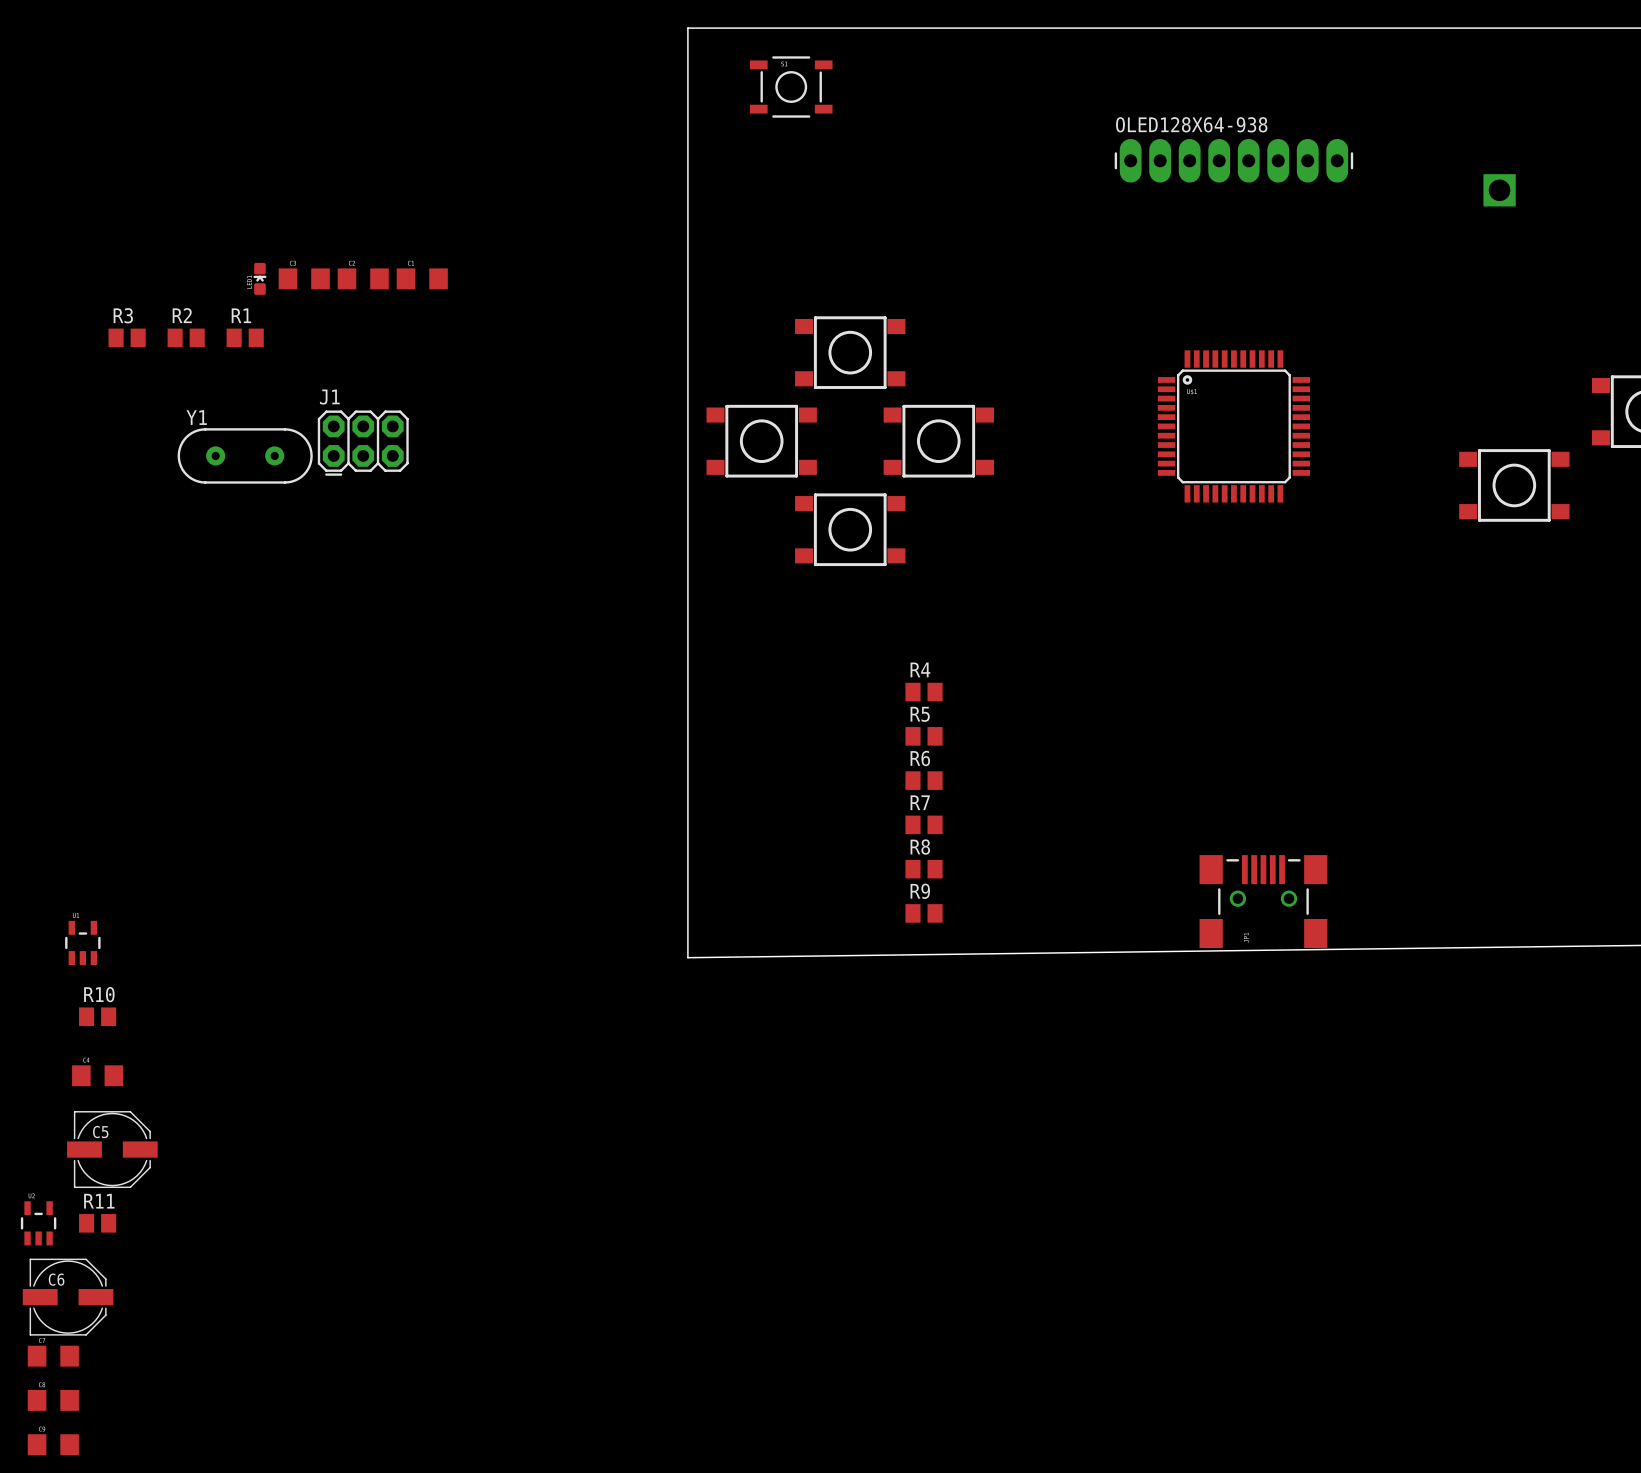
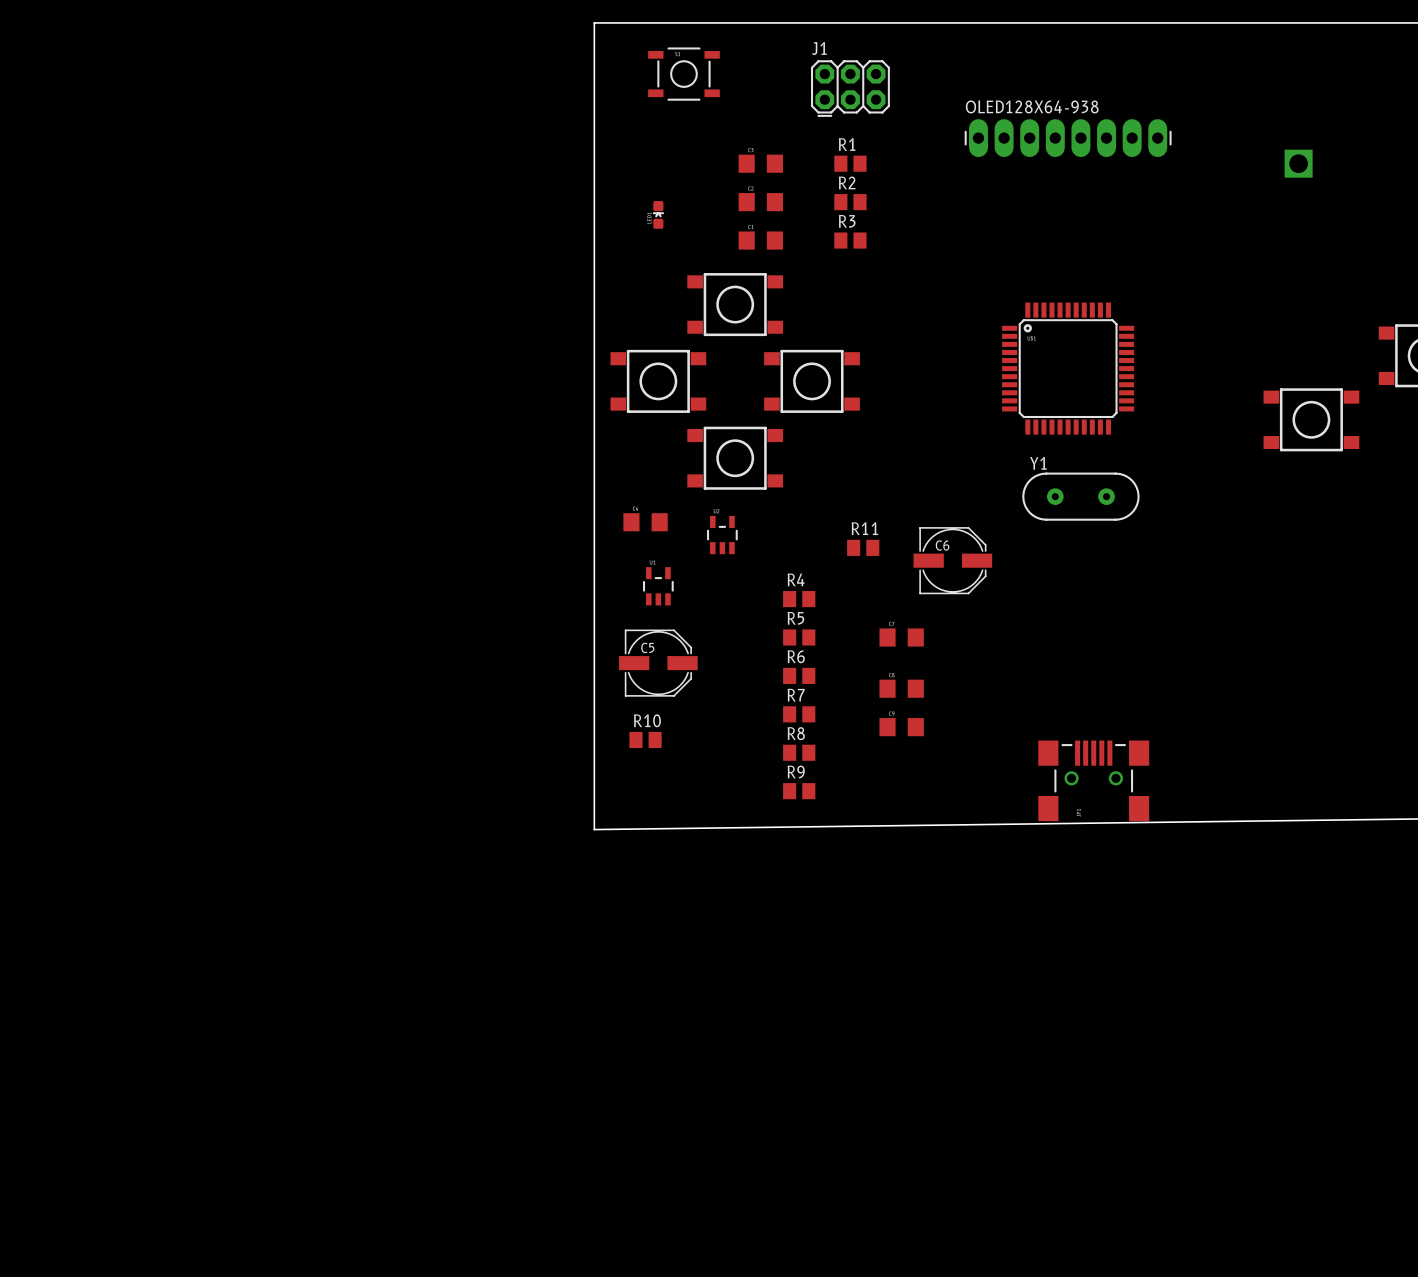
part position: (259, 278) -> (658, 214)
part position: (304, 278) -> (760, 163)
part position: (363, 278) -> (760, 202)
part position: (422, 278) -> (760, 240)
R3 position: (127, 337) -> (850, 240)
R2 position: (186, 337) -> (850, 202)
R1 position: (245, 337) -> (850, 163)
J1 position: (363, 443) -> (850, 88)
Y1 position: (245, 455) -> (1080, 496)
part position: (82, 942) -> (658, 586)
R10 position: (97, 1016) -> (645, 739)
part position: (97, 1075) -> (645, 522)
C5 position: (112, 1149) -> (658, 663)
part position: (38, 1223) -> (722, 535)
R11 position: (97, 1223) -> (863, 547)
C6 position: (68, 1297) -> (952, 560)
part position: (53, 1356) -> (901, 637)
part position: (53, 1400) -> (901, 688)
part position: (53, 1444) -> (901, 727)

